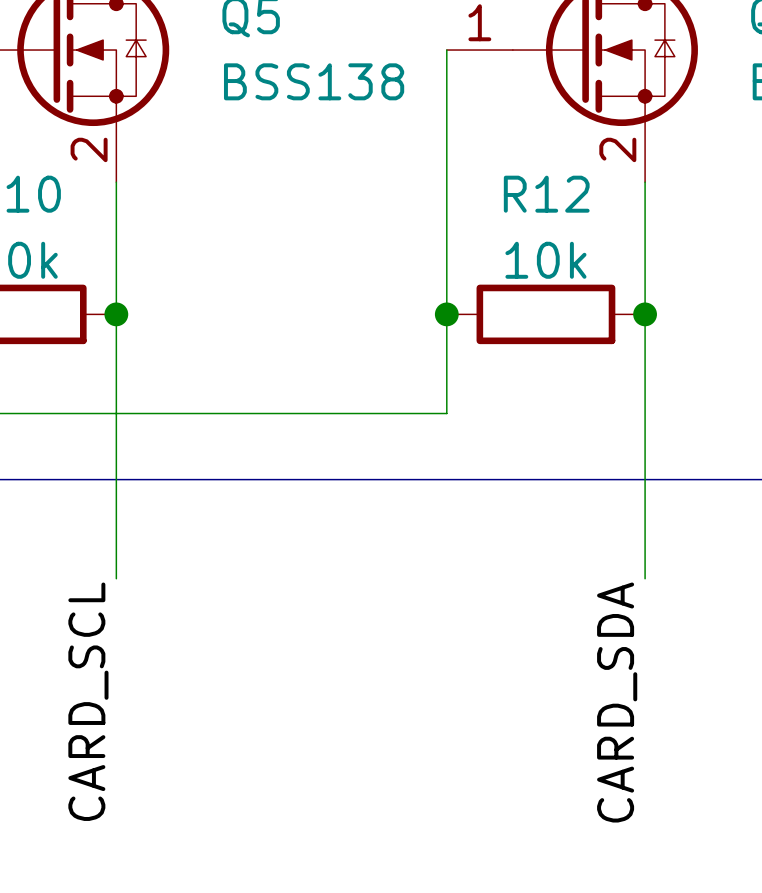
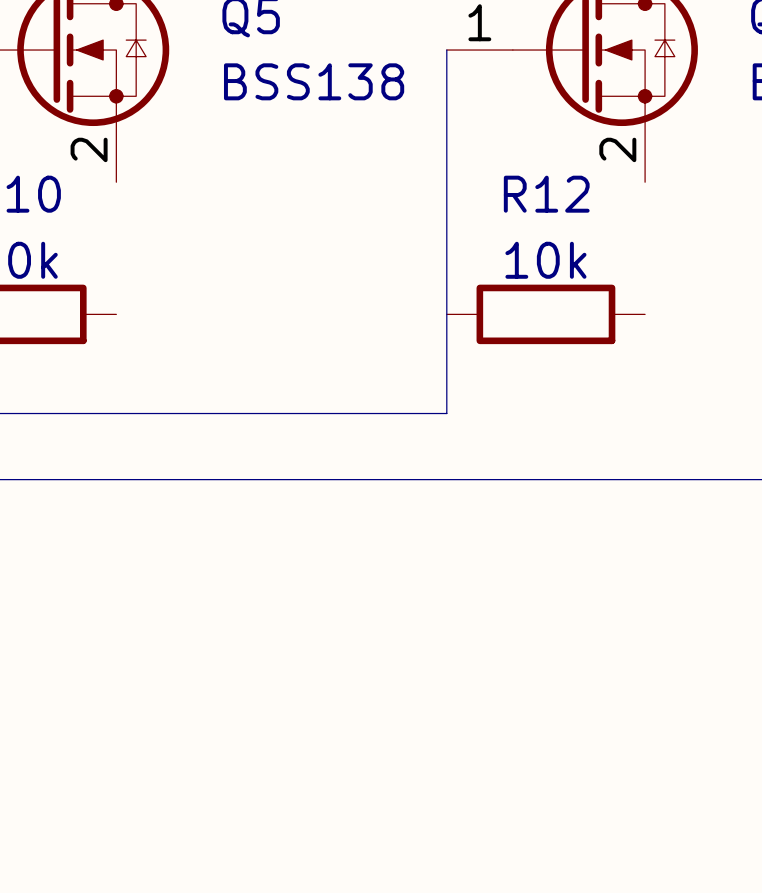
wire: (116, 182) (116, 578) -> none
wire: (645, 182) (645, 578) -> none
junction: (116, 314) -> none
junction: (446, 314) -> none
junction: (645, 314) -> none
label: CARD_SCL (88, 701) -> none
label: CARD_SDA (617, 702) -> none

